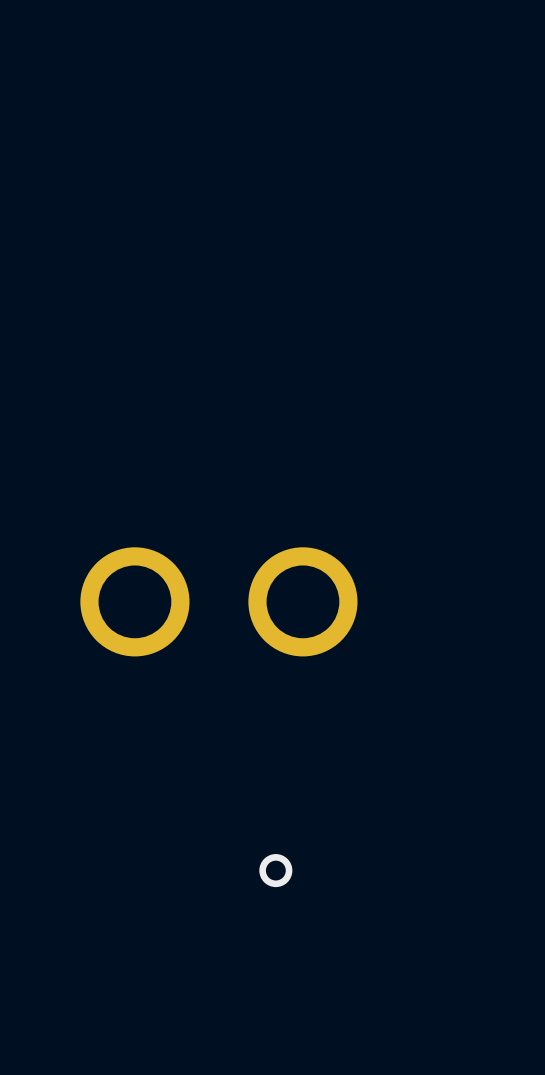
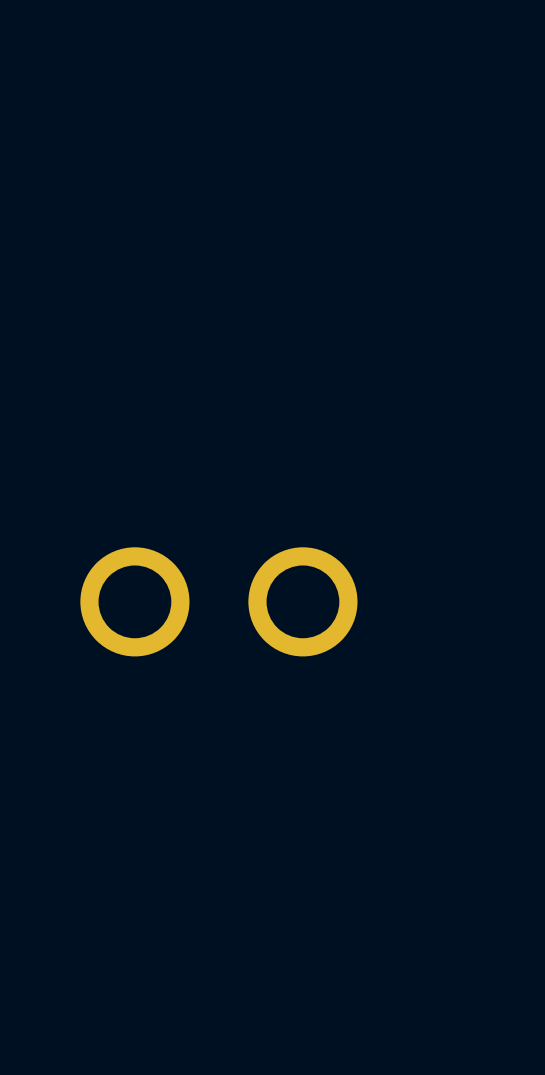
via: (275, 870) -> none

